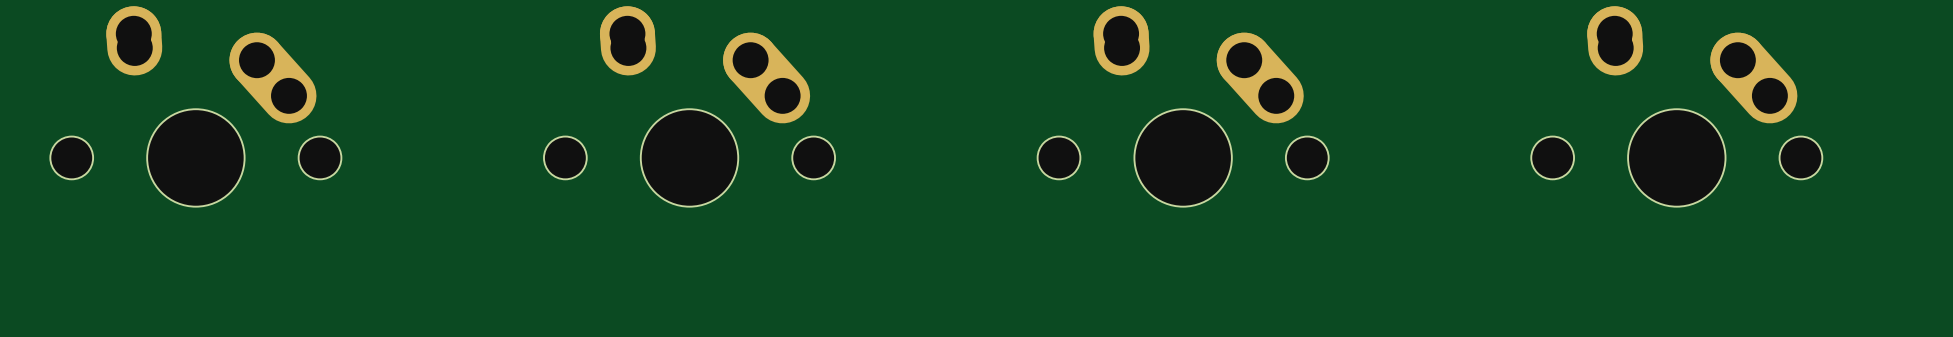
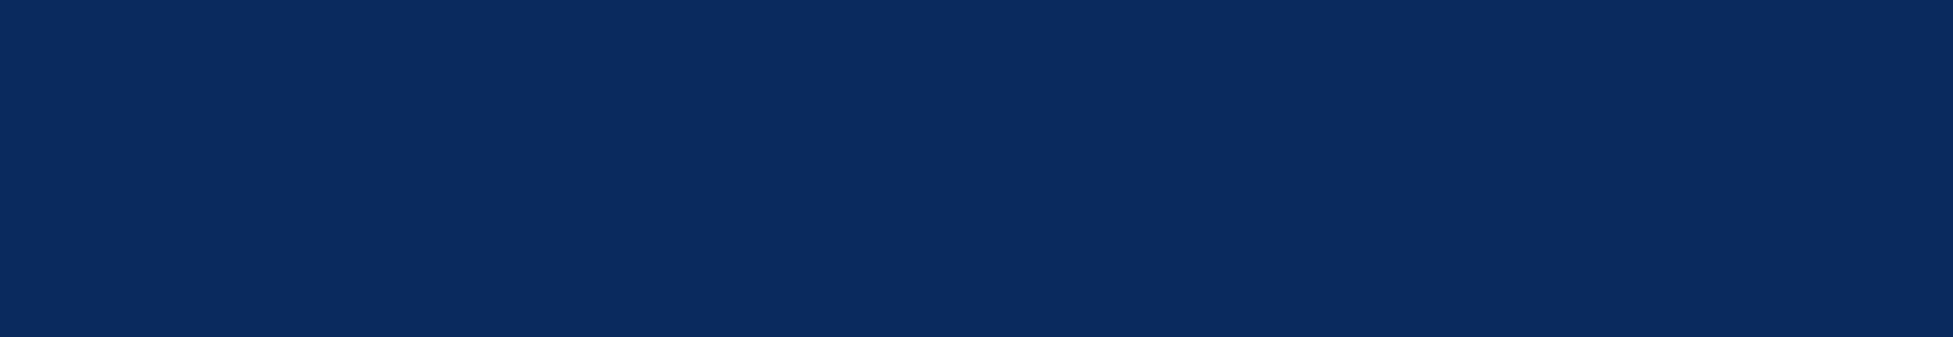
part: (195, 106) -> none
part: (689, 106) -> none
part: (1183, 106) -> none
part: (1676, 106) -> none

